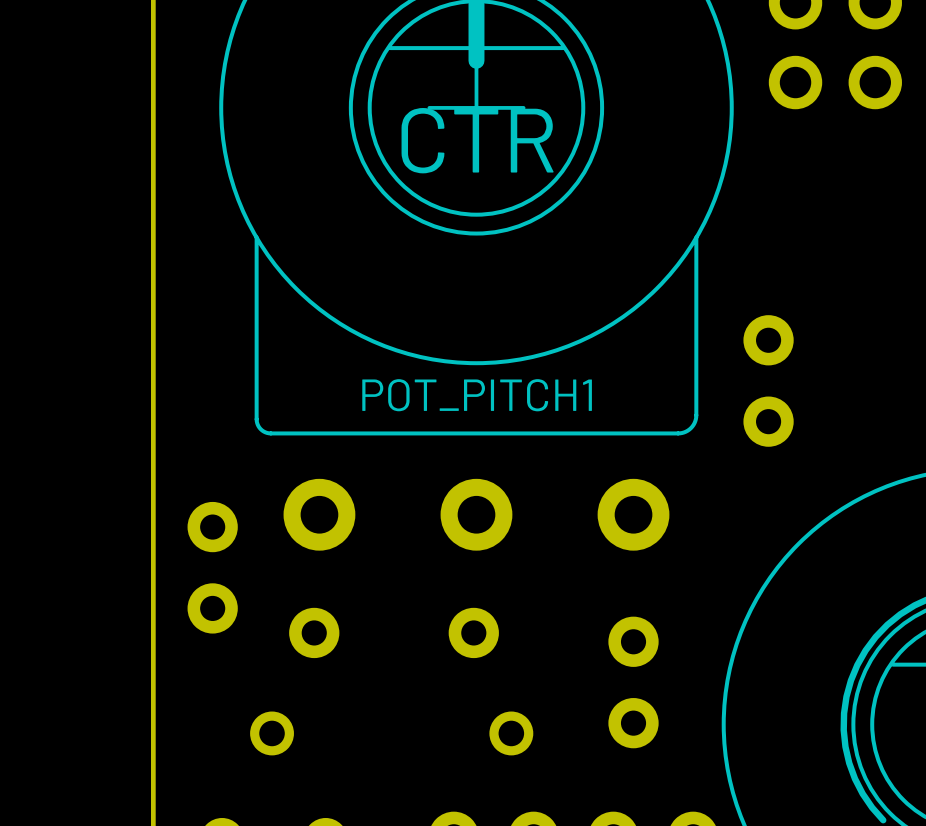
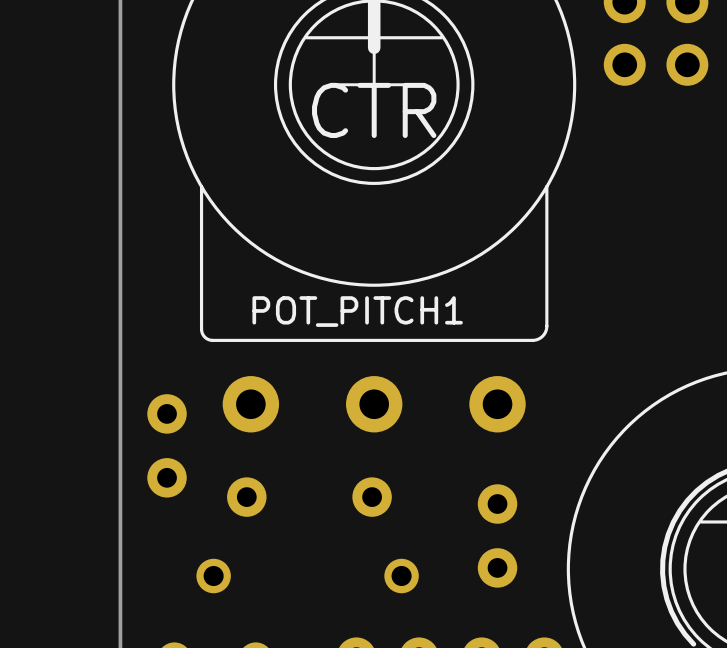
part: (768, 380) -> none

